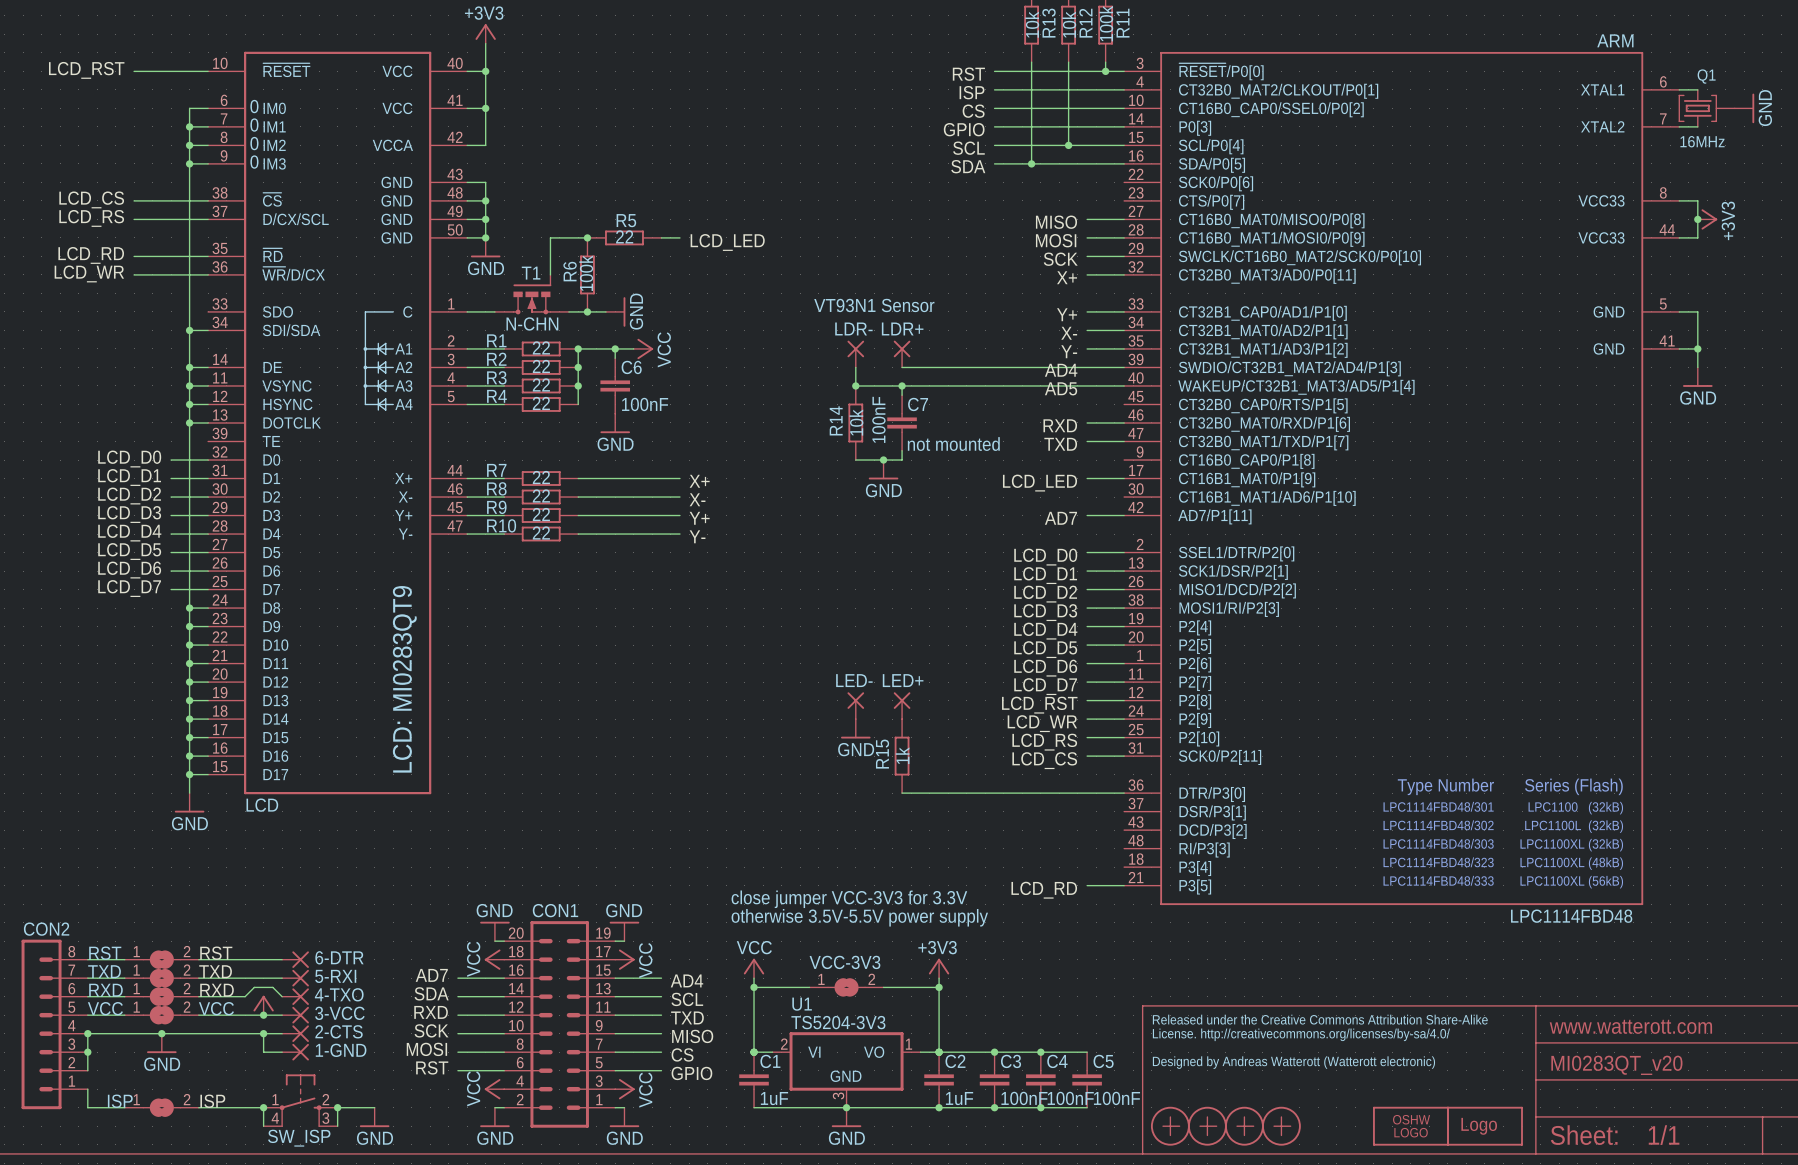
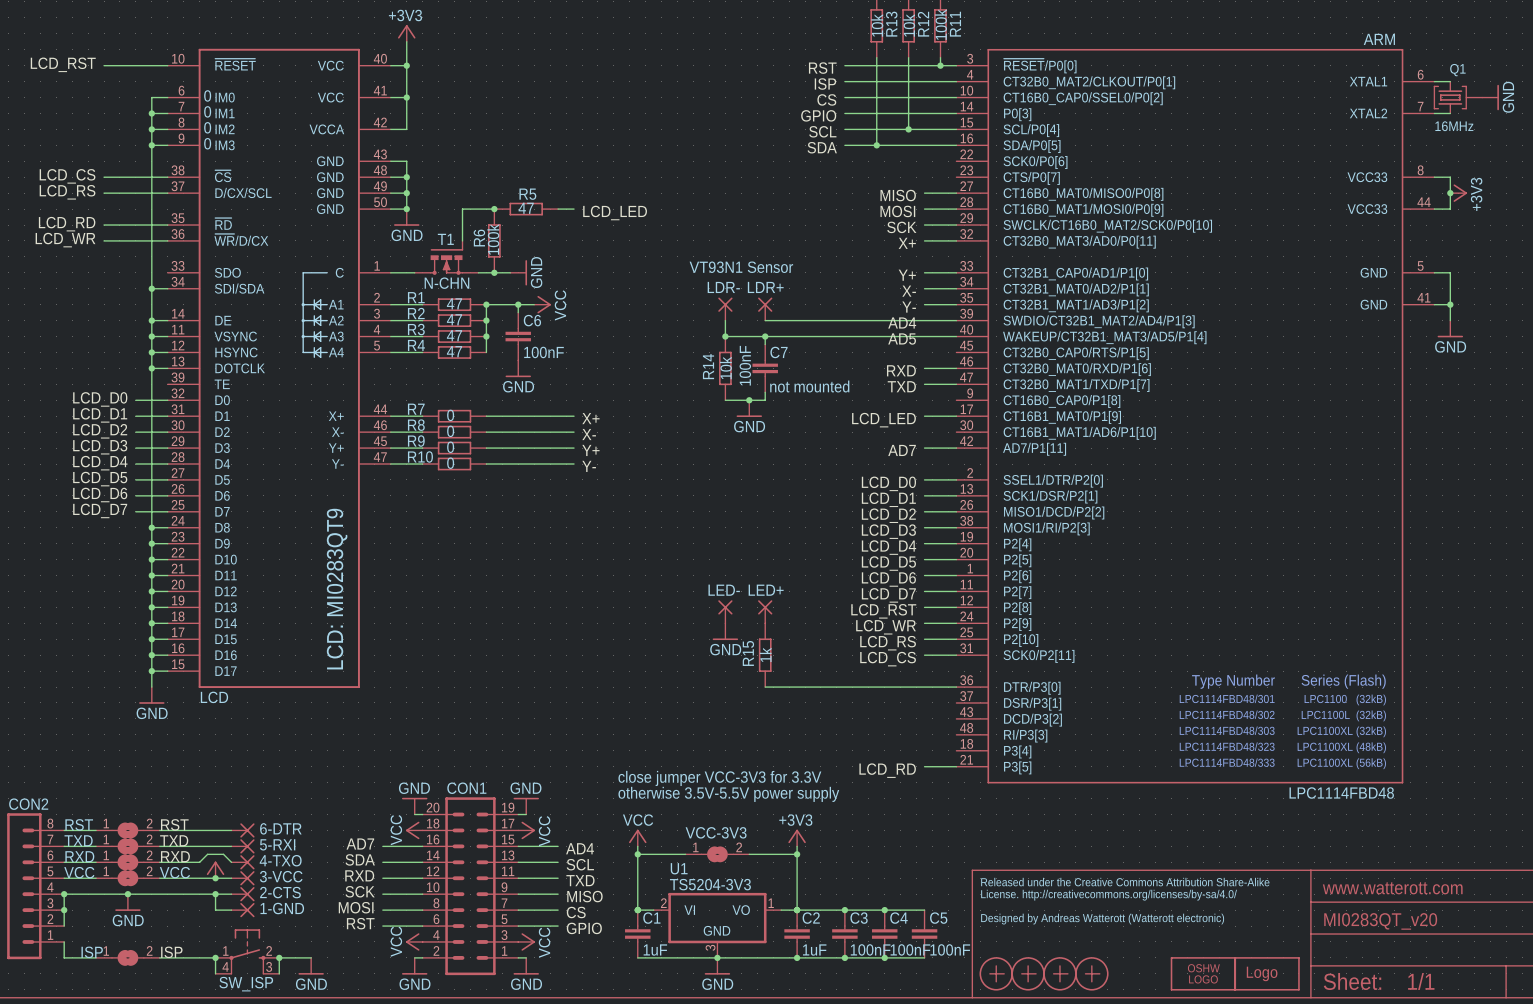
R5 value: 22 (624, 236) -> 47 (526, 208)
R1 value: 22 (541, 347) -> 47 (454, 303)
R2 value: 22 (541, 366) -> 47 (454, 319)
R3 value: 22 (541, 384) -> 47 (454, 335)
R4 value: 22 (541, 403) -> 47 (454, 351)
R7 value: 22 (541, 477) -> 0 (450, 415)
R8 value: 22 (541, 495) -> 0 (450, 431)
R9 value: 22 (541, 514) -> 0 (450, 447)
R10 value: 22 (541, 533) -> 0 (450, 463)

